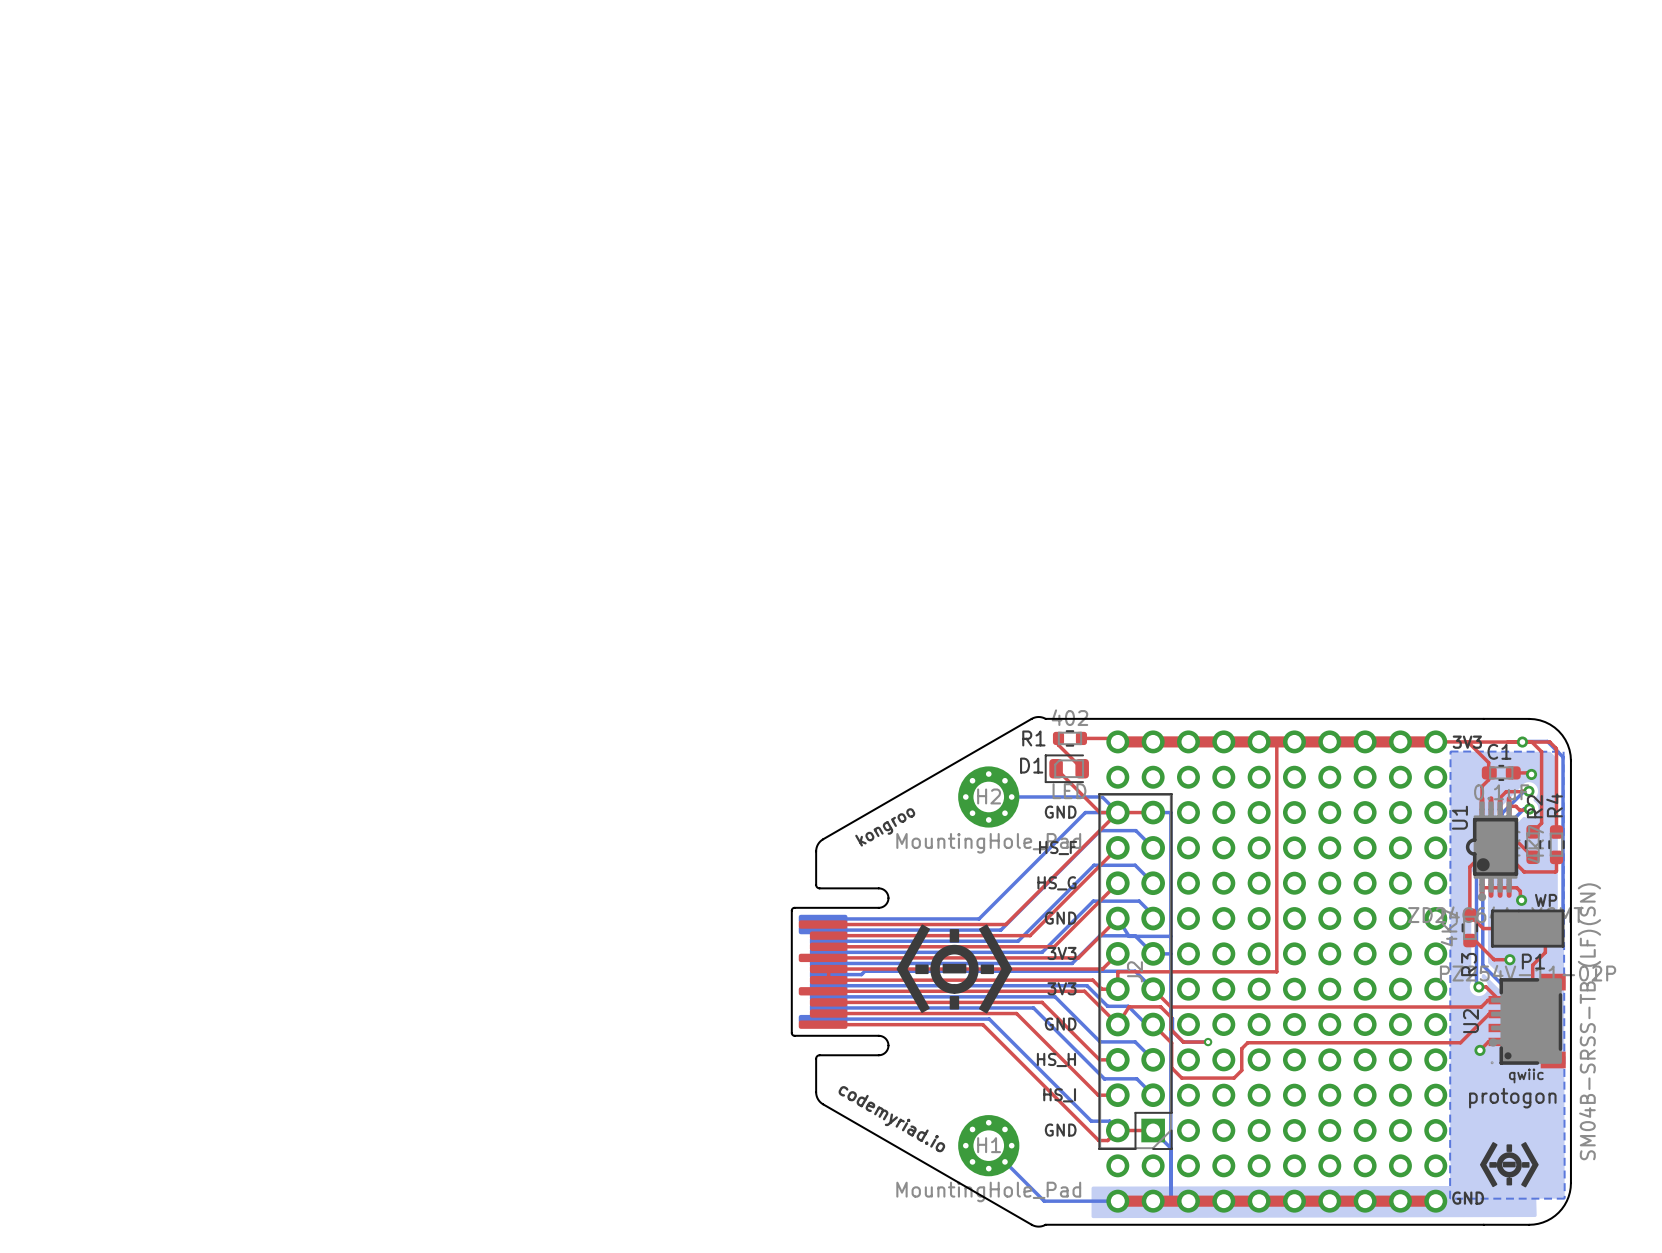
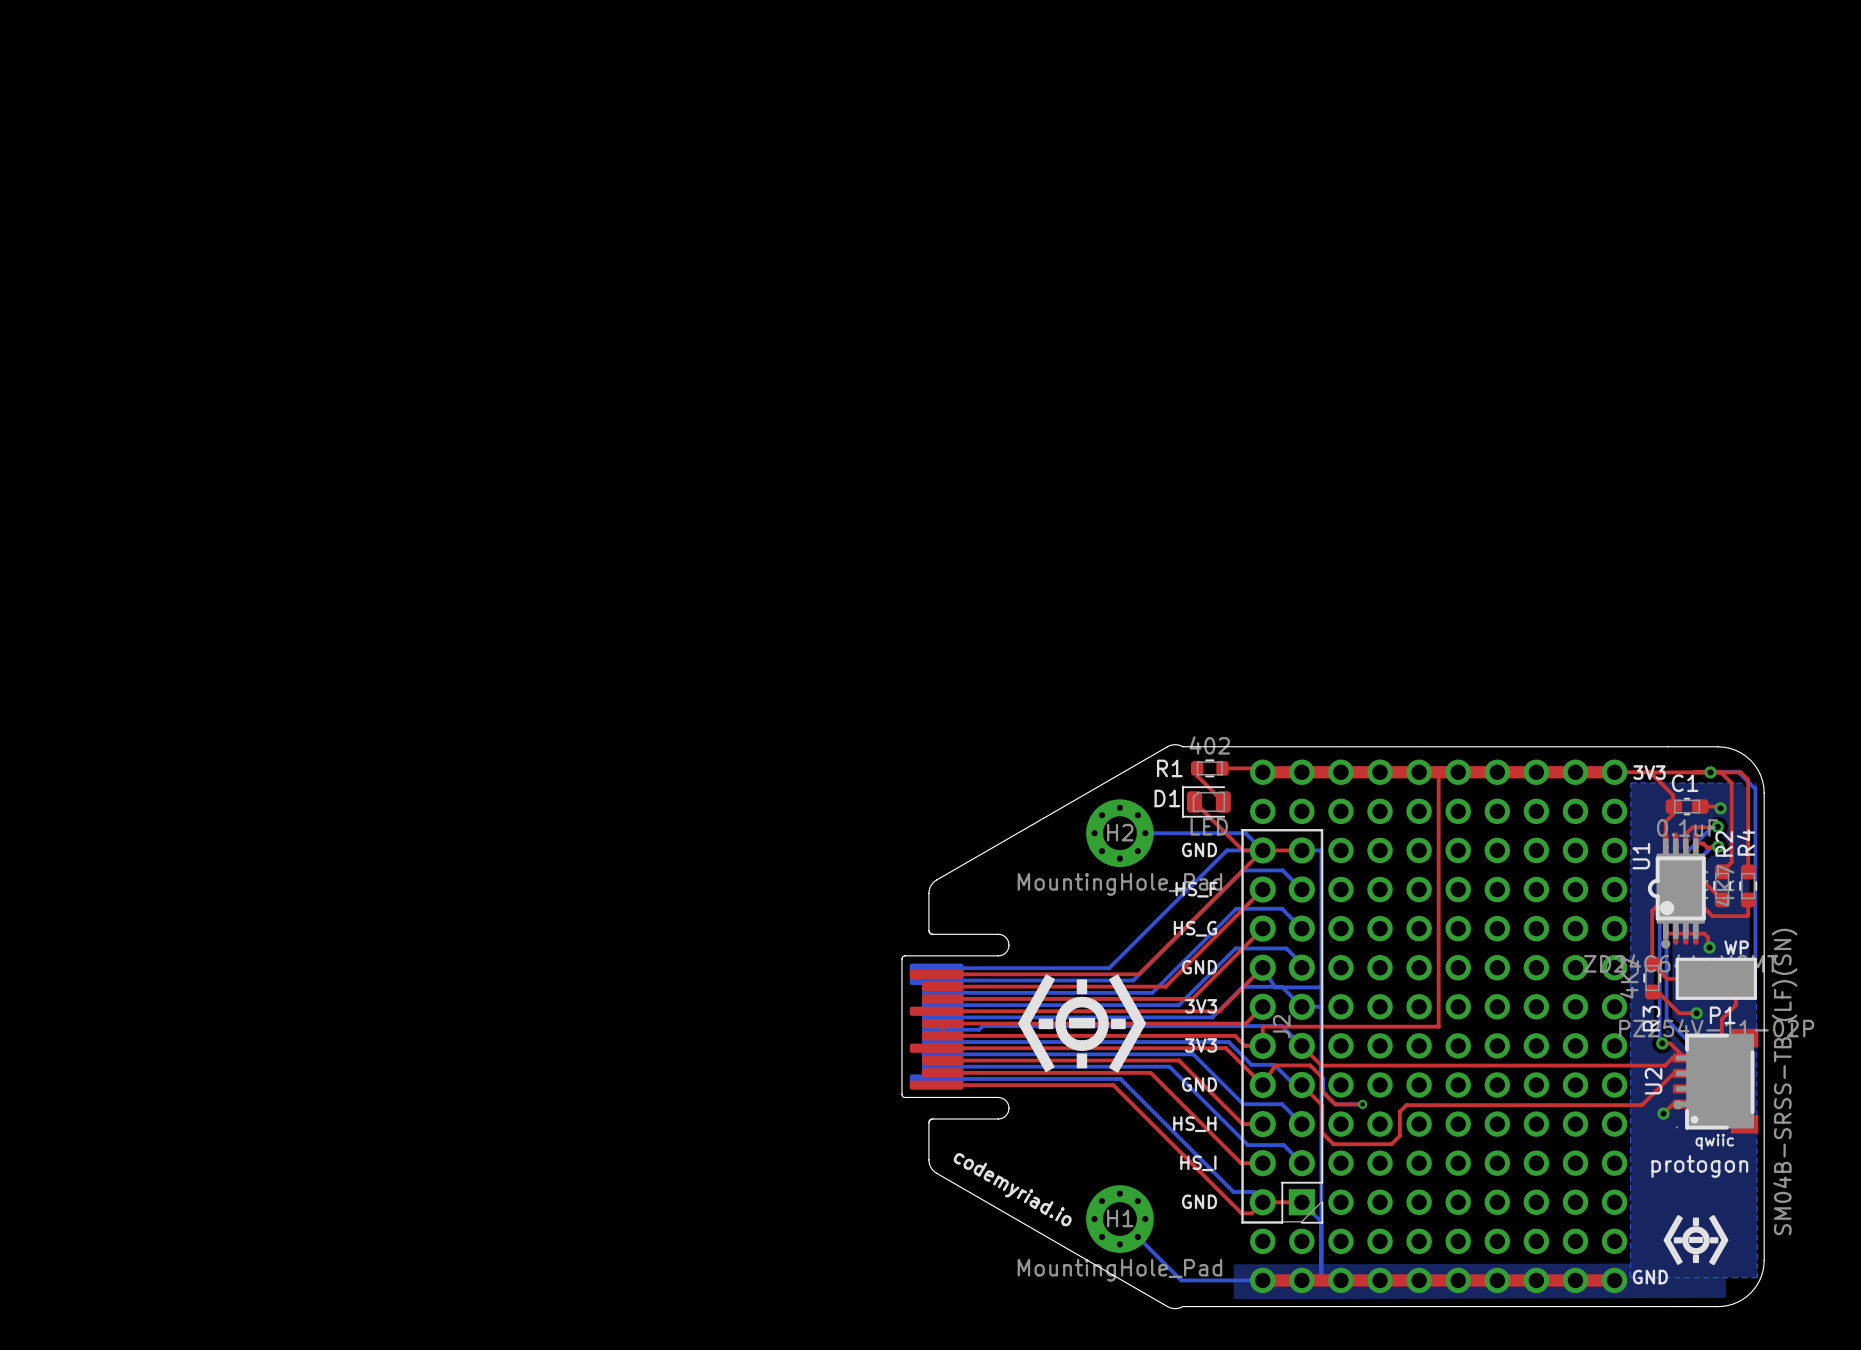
text: kongroo (885, 827) -> none

